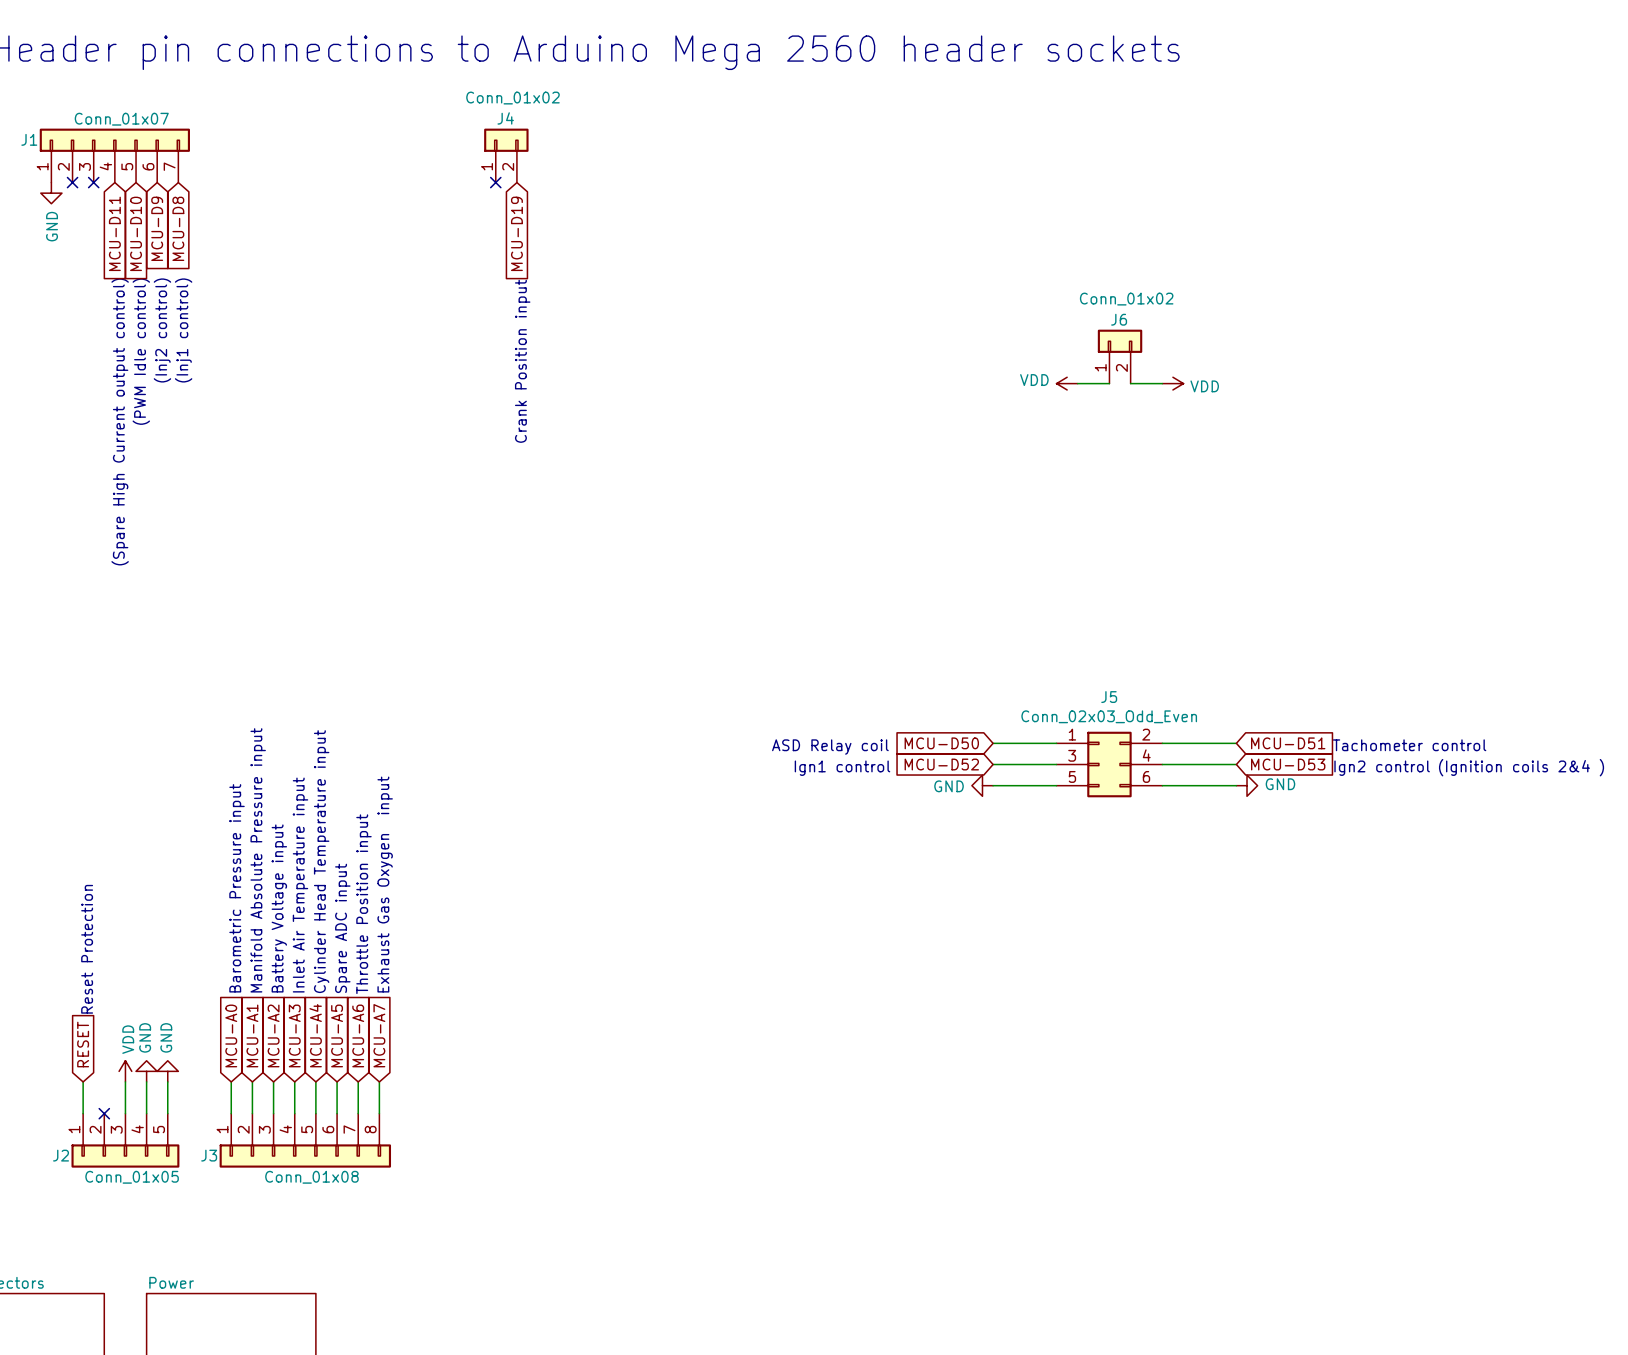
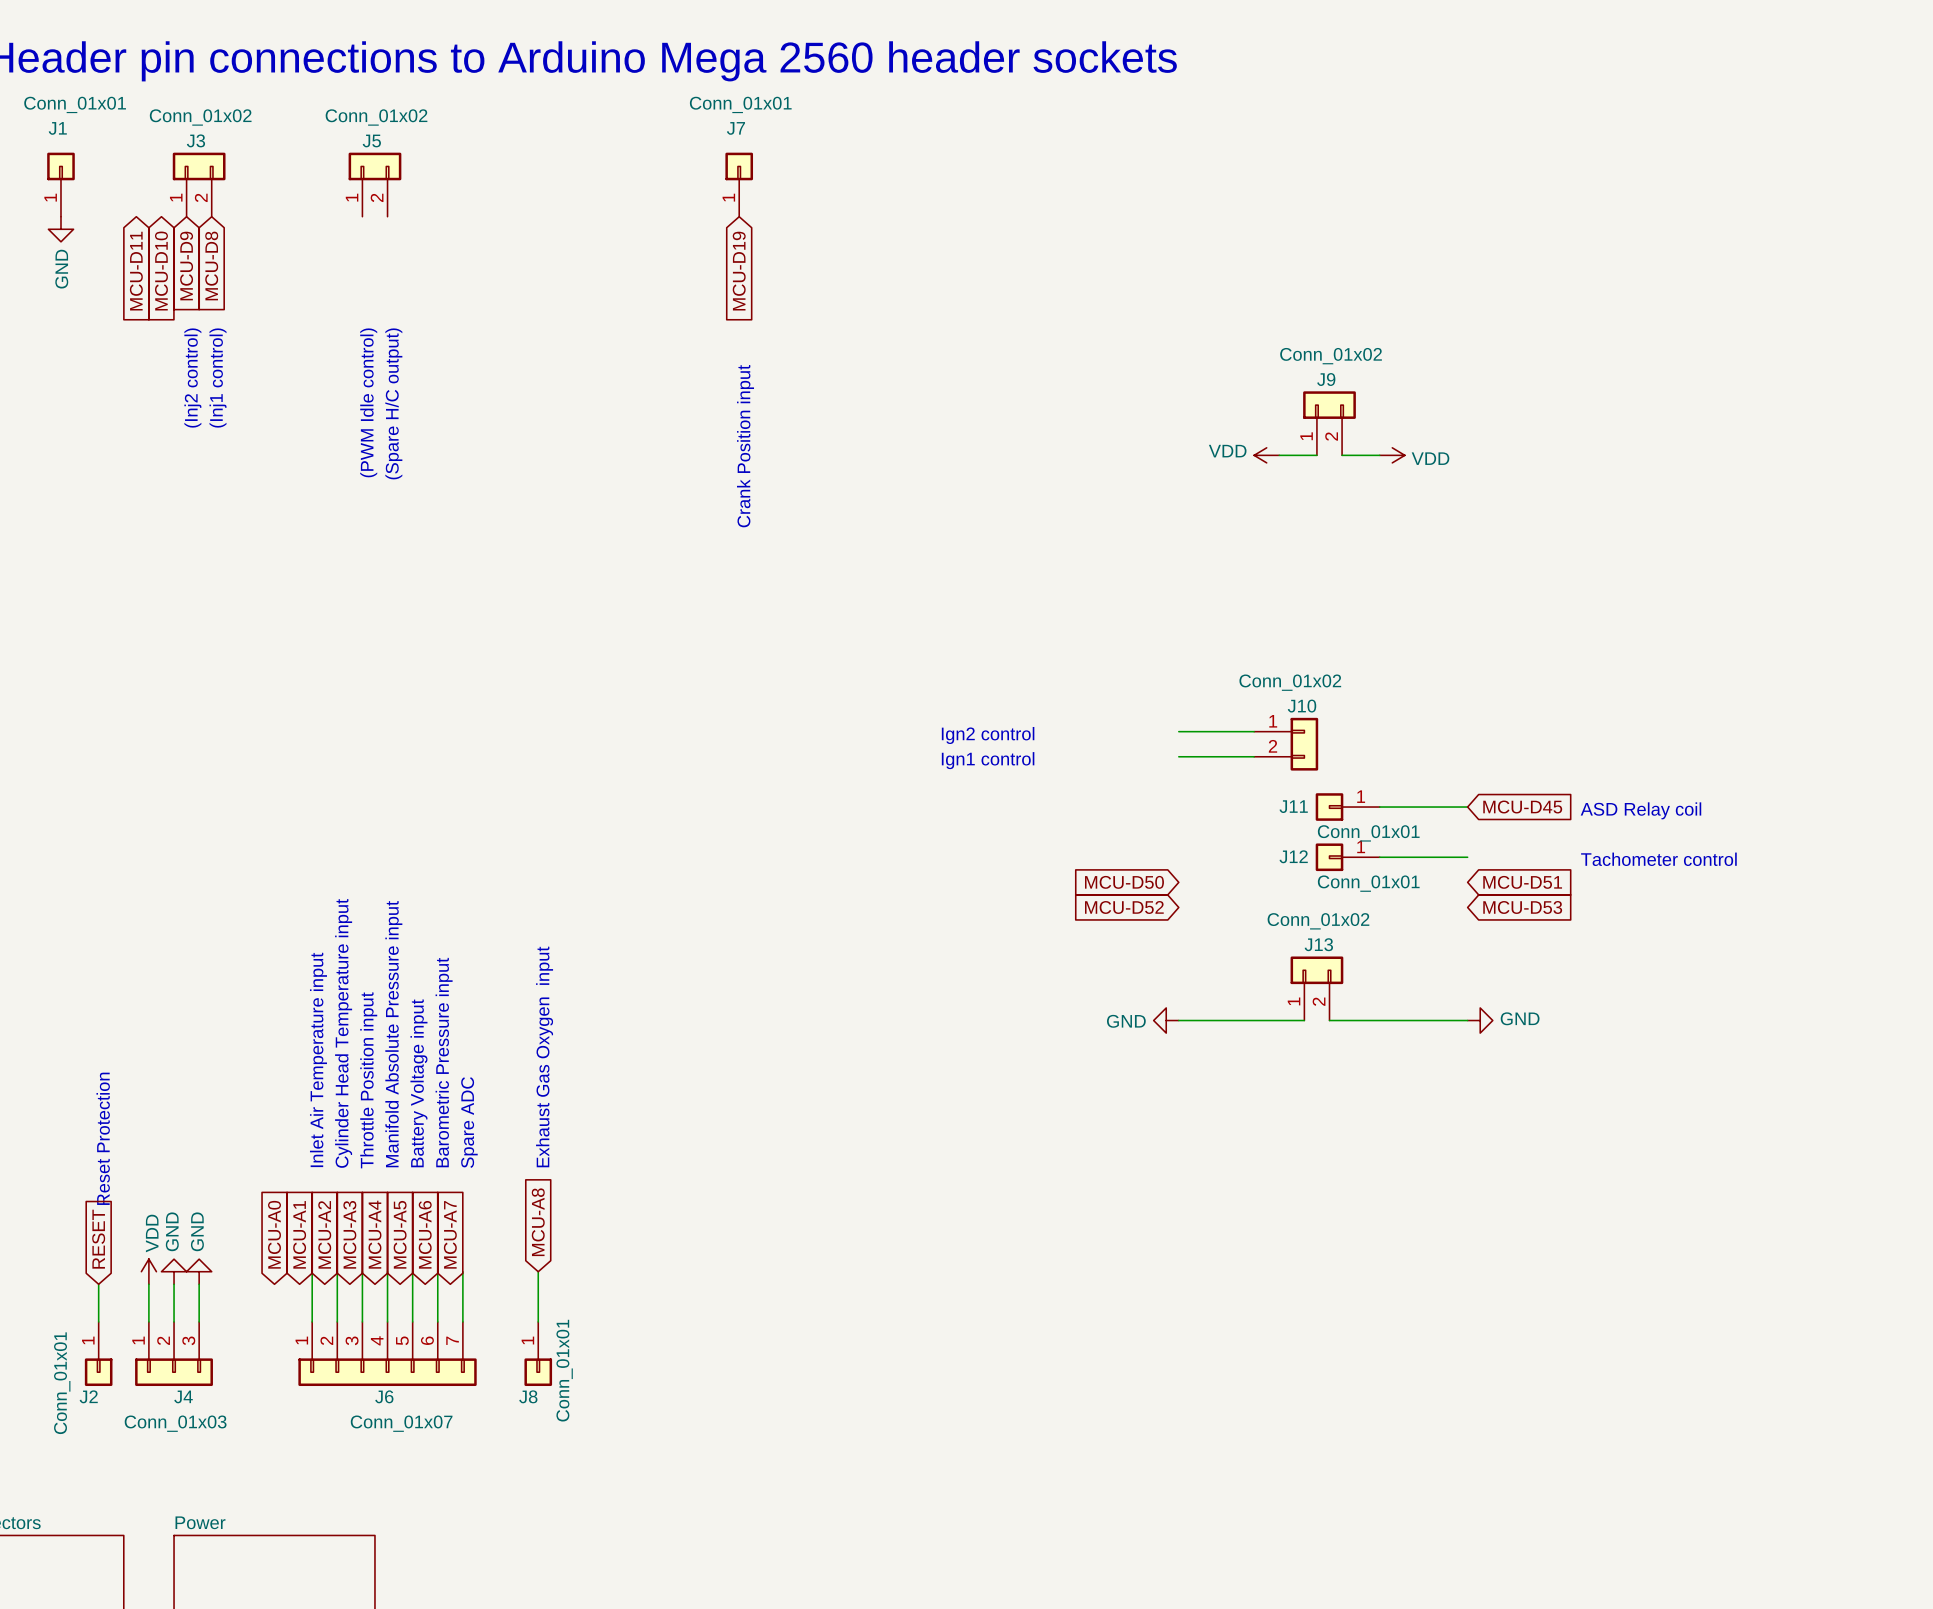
J4 value: Conn_01x02 (512, 98) -> Conn_01x03 (175, 1423)
J4 name position: J4 (505, 118) -> J4 (183, 1396)
J1 value: Conn_01x07 (121, 119) -> Conn_01x01 (75, 104)
J1 symbol: [39, 128, 190, 183] -> [47, 152, 75, 217]
J4 symbol: [484, 128, 529, 183] -> [135, 1321, 213, 1387]
J1 name position: J1 (29, 139) -> J1 (57, 128)
J7: none -> Conn_01x01 (739, 184)
no-connect mark: (72, 182) -> none
no-connect mark: (93, 182) -> none
no-connect mark: (495, 182) -> none
global label position: MCU-D19 (516, 233) -> MCU-D19 (739, 271)
J6 name: J6 (1119, 319) -> J9 (1326, 379)
text position: (PWM Idle control) (141, 351) -> (PWM Idle control) (368, 402)
text: none -> (Spare H/C output) (393, 403)
text position: Crank Position input (522, 361) -> Crank Position input (745, 446)
text: (Spare High Current output control) (120, 421) -> none
text: none -> Ign2 control (988, 735)
J10: none -> Conn_01x02 (1286, 744)
J11: none -> Conn_01x01 (1347, 807)
global label: none -> MCU-D45 (1522, 807)
text: none -> ASD Relay coil (1640, 810)
J5 name position: J5 (1109, 697) -> J5 (371, 140)
J5 value: Conn_02x03_Odd_Even (1109, 716) -> Conn_01x02 (376, 117)
J12: none -> Conn_01x01 (1347, 857)
J5 symbol: [1056, 731, 1163, 798] -> [348, 152, 402, 217]
wire: (993, 743) (1056, 743) -> (1178, 756) (1254, 756)
wire: (1162, 743) (1236, 743) -> (1379, 807) (1467, 807)
text position: Tachometer control (1409, 745) -> Tachometer control (1658, 859)
text: ASD Relay coil (830, 747) -> none
wire: (993, 764) (1056, 764) -> (1178, 731) (1254, 731)
wire: (1162, 764) (1236, 764) -> none
text: (Ignition coils 2&4 ) (1521, 767) -> none
text position: Ign1 control (842, 768) -> Ign1 control (988, 760)
text: Ign2 control (1382, 768) -> none
power symbol position: GND (982, 785) -> GND (1166, 1020)
wire: (993, 785) (1056, 785) -> none
wire: (1162, 785) (1236, 785) -> (1379, 857) (1467, 857)
power symbol position: GND (1247, 785) -> GND (1480, 1020)
J13: none -> Conn_01x02 (1316, 988)
wire: none -> (1178, 1020) (1304, 1020)
wire: none -> (1329, 1020) (1467, 1020)
text position: Manifold Absolute Pressure input (258, 860) -> Manifold Absolute Pressure input (393, 1034)
text position: Cylinder Head Temperature input (321, 861) -> Cylinder Head Temperature input (343, 1033)
text position: Exhaust Gas Oxygen input (385, 884) -> Exhaust Gas Oxygen input (544, 1056)
text position: Inlet Air Temperature input (300, 885) -> Inlet Air Temperature input (318, 1059)
text position: Barometric Pressure input (237, 888) -> Barometric Pressure input (444, 1062)
text position: Throttle Position input (363, 904) -> Throttle Position input (368, 1080)
text position: Battery Voltage input (279, 908) -> Battery Voltage input (418, 1083)
text: Spare ADC input (342, 928) -> none
text: none -> Spare ADC (469, 1122)
global label: none -> MCU-A8 (538, 1222)
wire: none -> (312, 1271) (312, 1321)
wire: none -> (337, 1271) (337, 1321)
wire: none -> (362, 1271) (362, 1321)
wire: none -> (387, 1271) (387, 1321)
wire: none -> (412, 1271) (412, 1321)
wire: none -> (437, 1271) (437, 1321)
wire: none -> (462, 1271) (462, 1321)
wire: none -> (538, 1271) (538, 1321)
wire: (231, 1081) (231, 1113) -> none
wire: (252, 1081) (252, 1113) -> none
wire: (273, 1081) (273, 1113) -> none
wire: (294, 1081) (294, 1113) -> none
wire: (315, 1081) (315, 1113) -> none
wire: (337, 1081) (337, 1113) -> none
wire: (358, 1081) (358, 1113) -> none
wire: (379, 1081) (379, 1113) -> none
J2 symbol: [71, 1113, 180, 1168] -> [84, 1321, 113, 1387]
no-connect mark: (104, 1113) -> none
J3 symbol: [219, 1113, 392, 1168] -> [172, 152, 226, 217]
J6: none -> Conn_01x07 (387, 1353)
J8: none -> Conn_01x01 (538, 1353)
J2 name position: J2 (61, 1155) -> J2 (88, 1396)
J3 name position: J3 (209, 1155) -> J3 (195, 140)
J2 value: Conn_01x05 (132, 1177) -> Conn_01x01 (62, 1383)
J3 value: Conn_01x08 (311, 1177) -> Conn_01x02 (200, 117)

